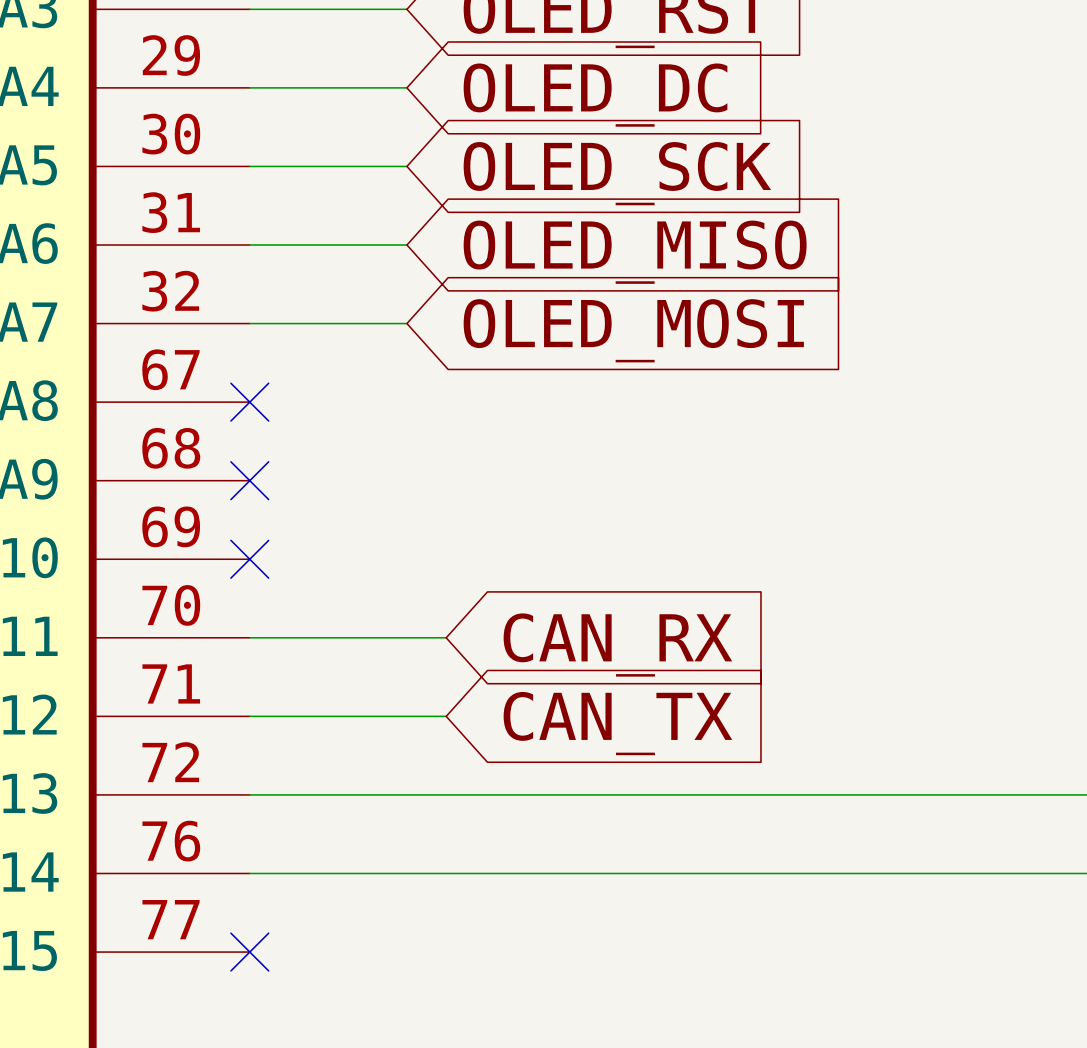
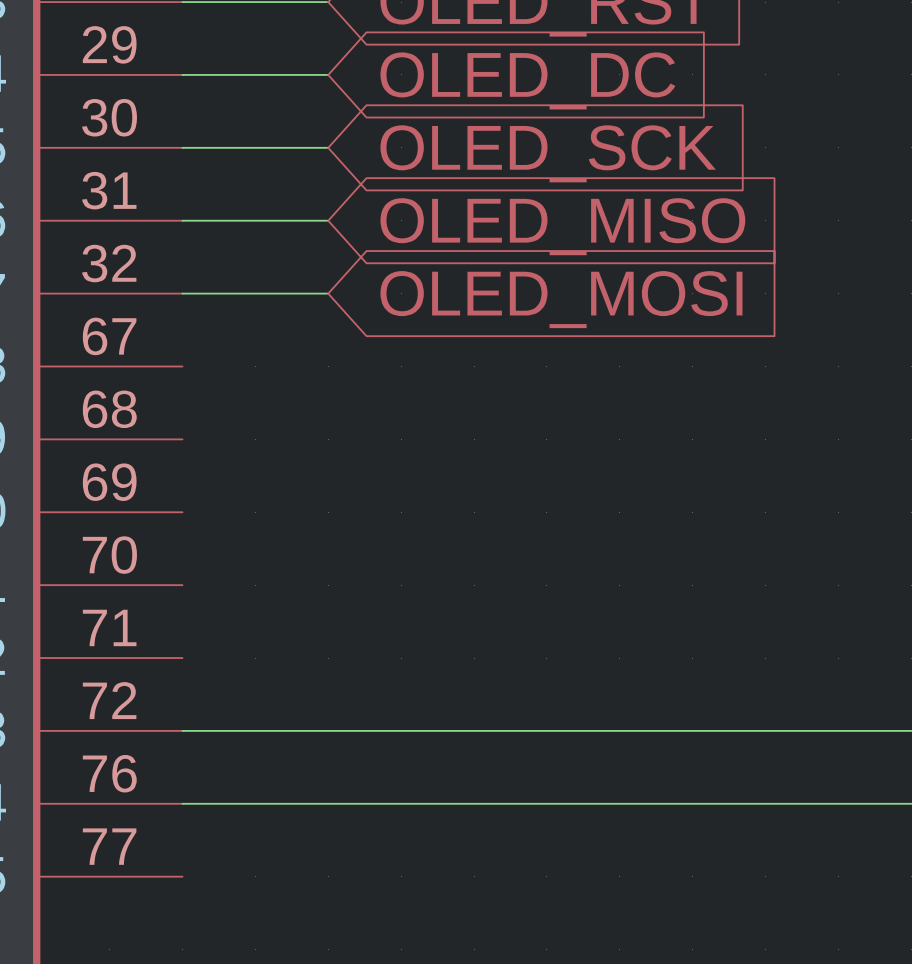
no-connect mark: (249, 402) -> none
no-connect mark: (249, 480) -> none
no-connect mark: (249, 559) -> none
wire: (249, 637) (446, 637) -> none
global label: CAN_RX (617, 645) -> none
wire: (249, 716) (446, 716) -> none
global label: CAN_TX (617, 723) -> none
no-connect mark: (249, 952) -> none

